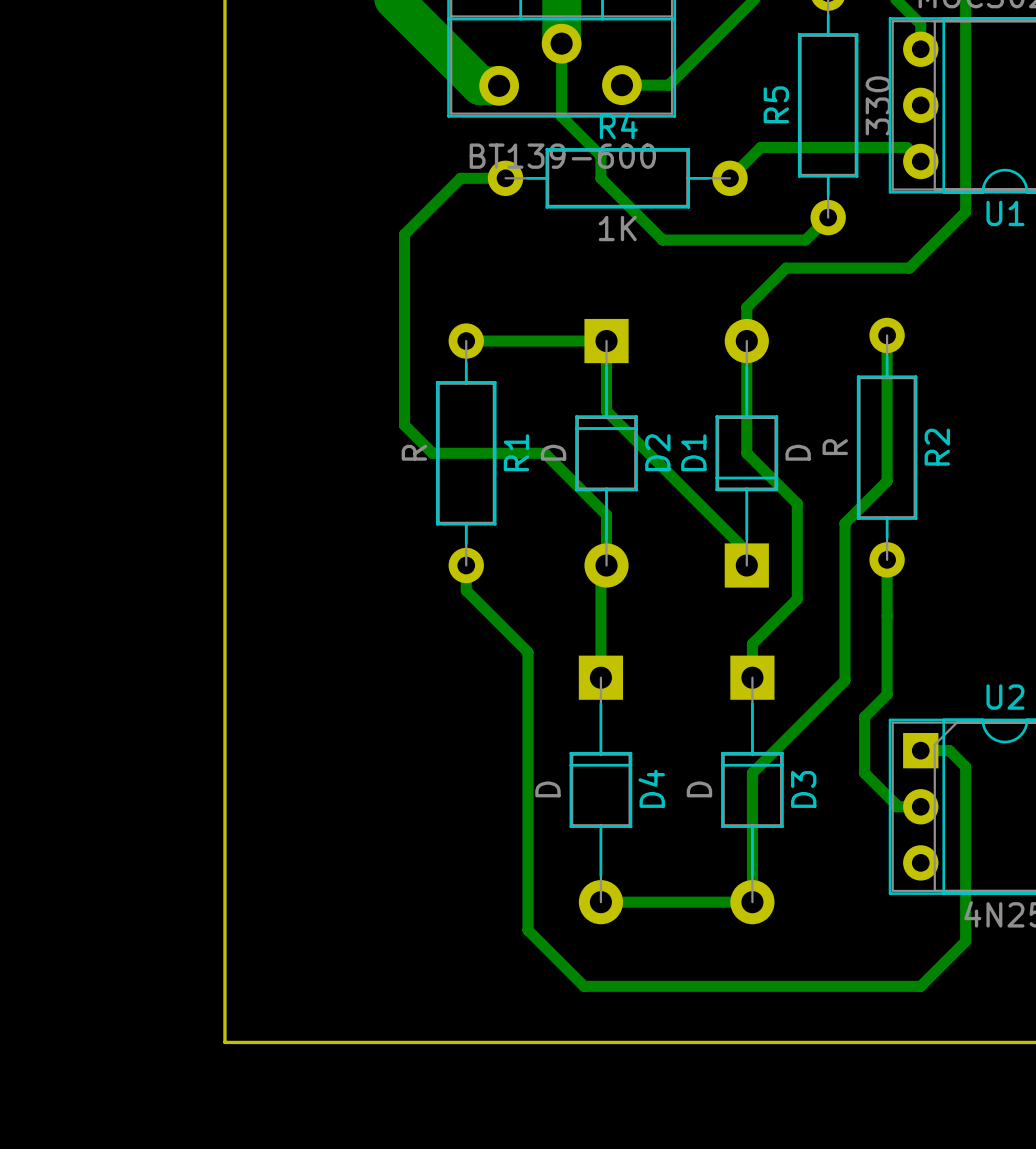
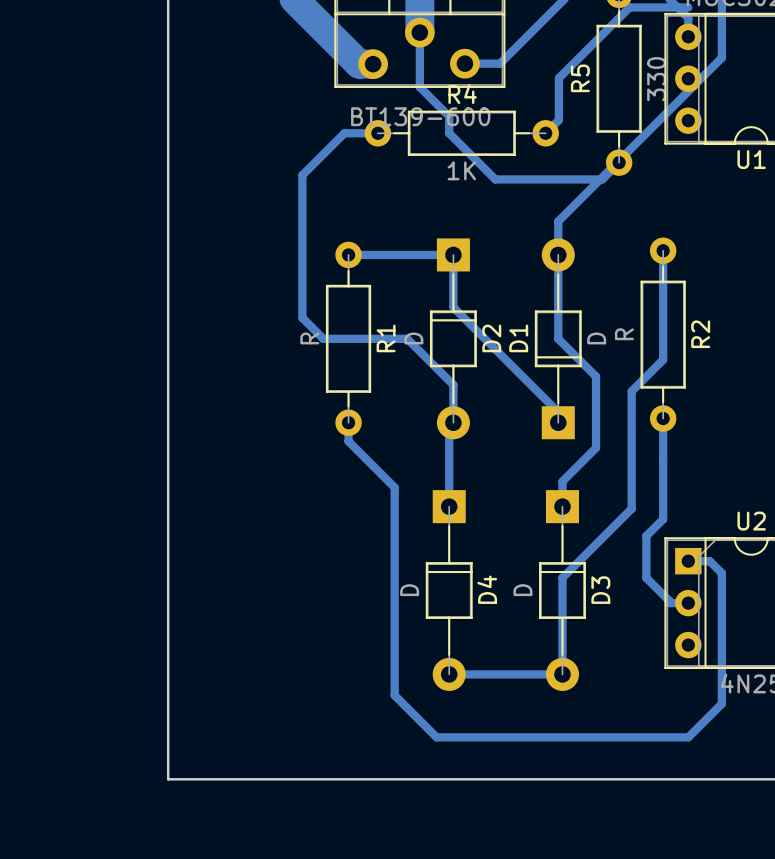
bottom track: (965, 77) (965, 211) (909, 268) (786, 268) (746, 307) -> (721, 57) (558, 221) (558, 229)
bottom track: (747, 160) (760, 147) (906, 147) (920, 161) -> (558, 120) (558, 78) (629, 7) (688, 7)

